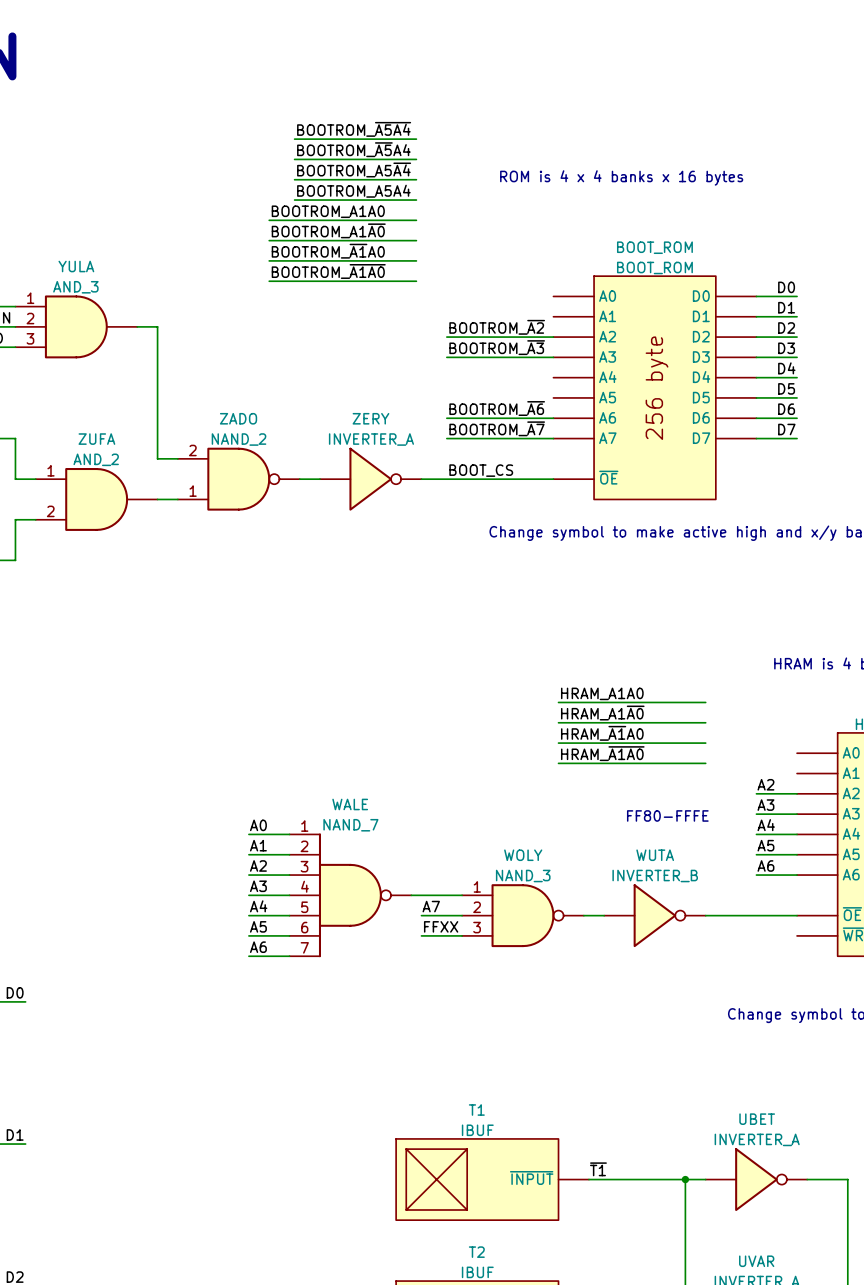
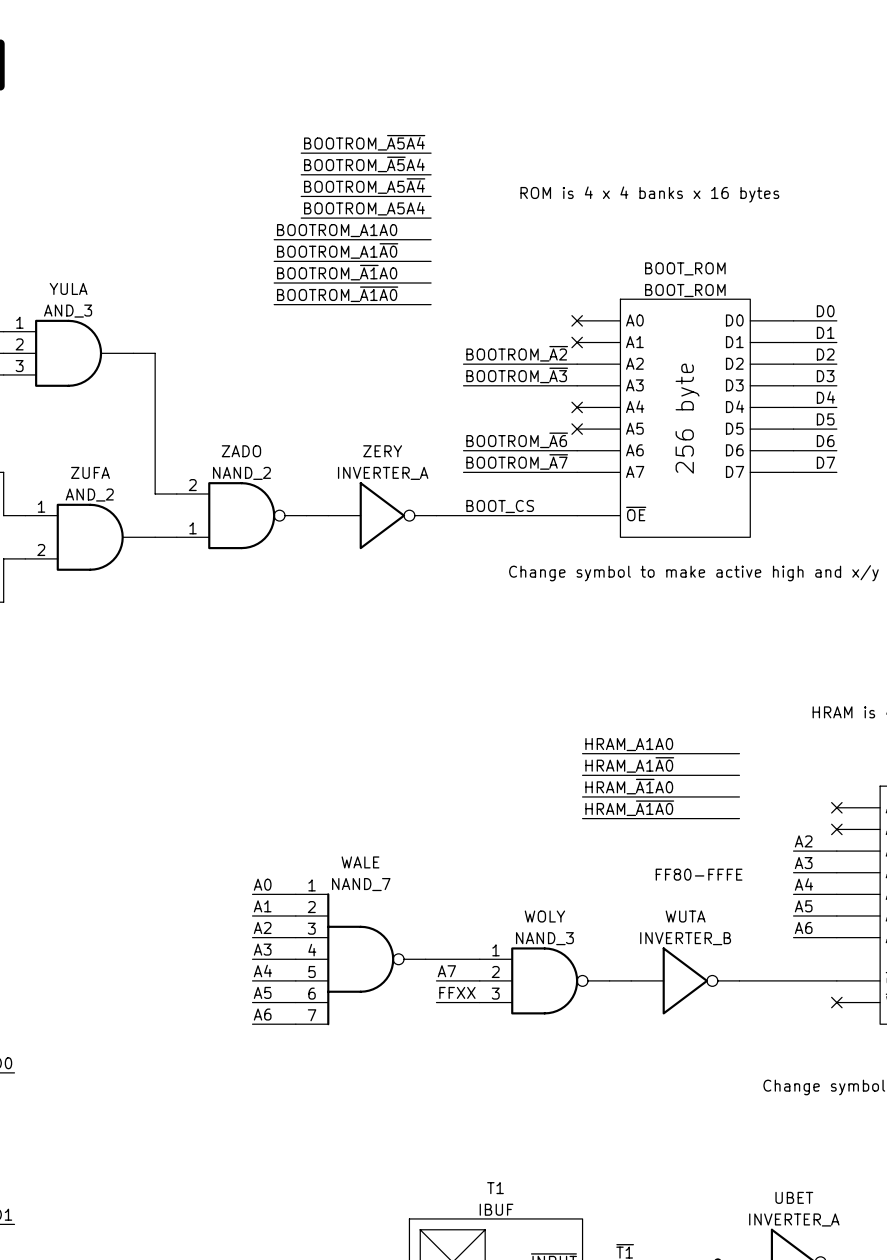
no-connect mark: none -> (577, 320)
no-connect mark: none -> (577, 342)
no-connect mark: none -> (577, 407)
no-connect mark: none -> (577, 429)
no-connect mark: none -> (836, 807)
no-connect mark: none -> (836, 829)
no-connect mark: none -> (836, 1002)

